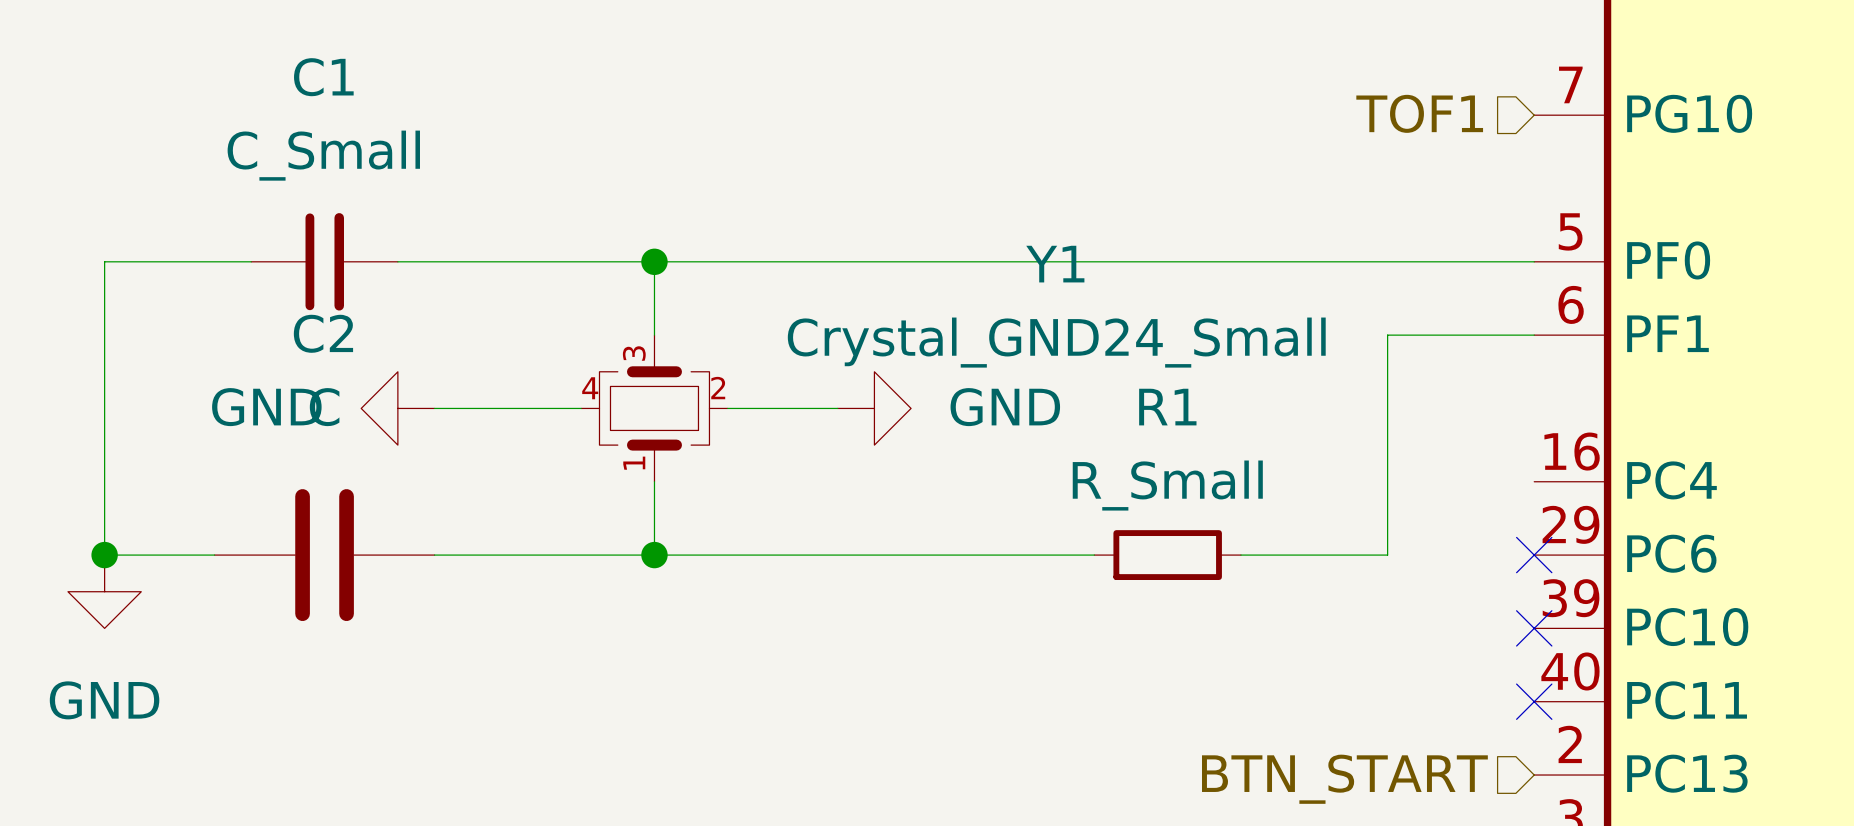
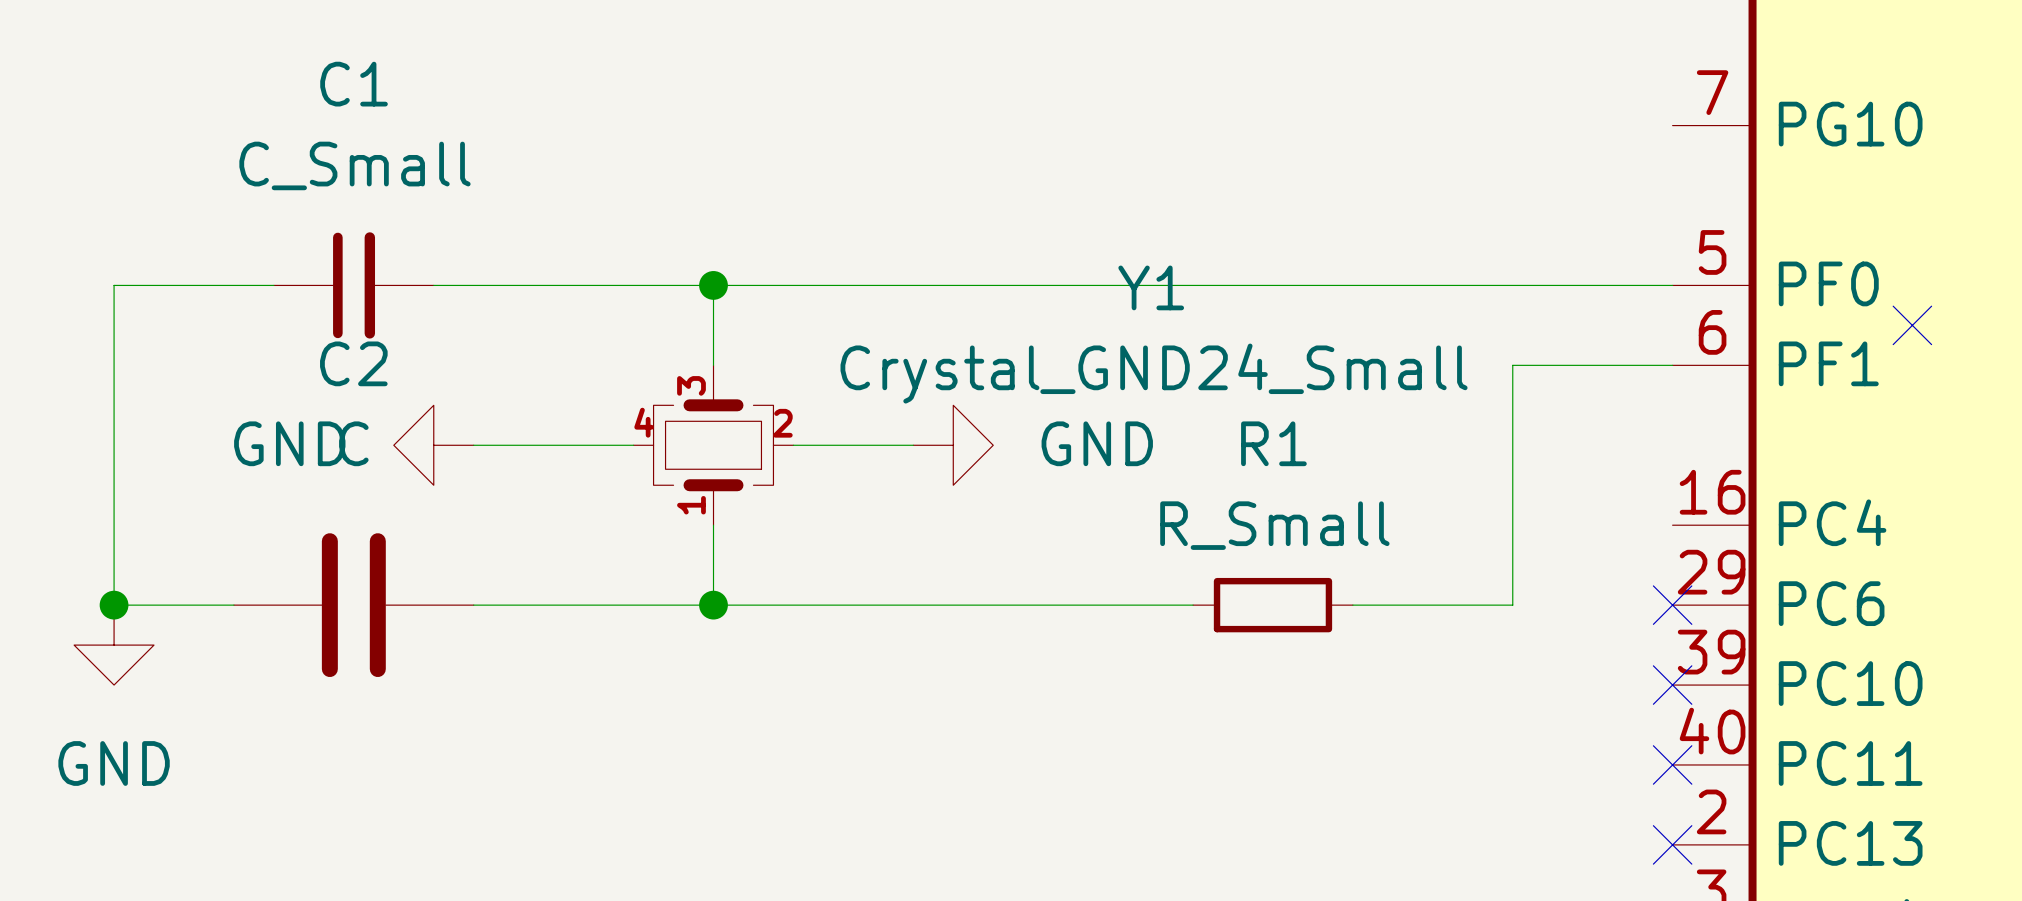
hierarchical label: TOF1 (1419, 113) -> none
no-connect mark: none -> (1912, 325)
no-connect mark: none -> (1672, 844)
hierarchical label: BTN_START (1344, 779) -> none

